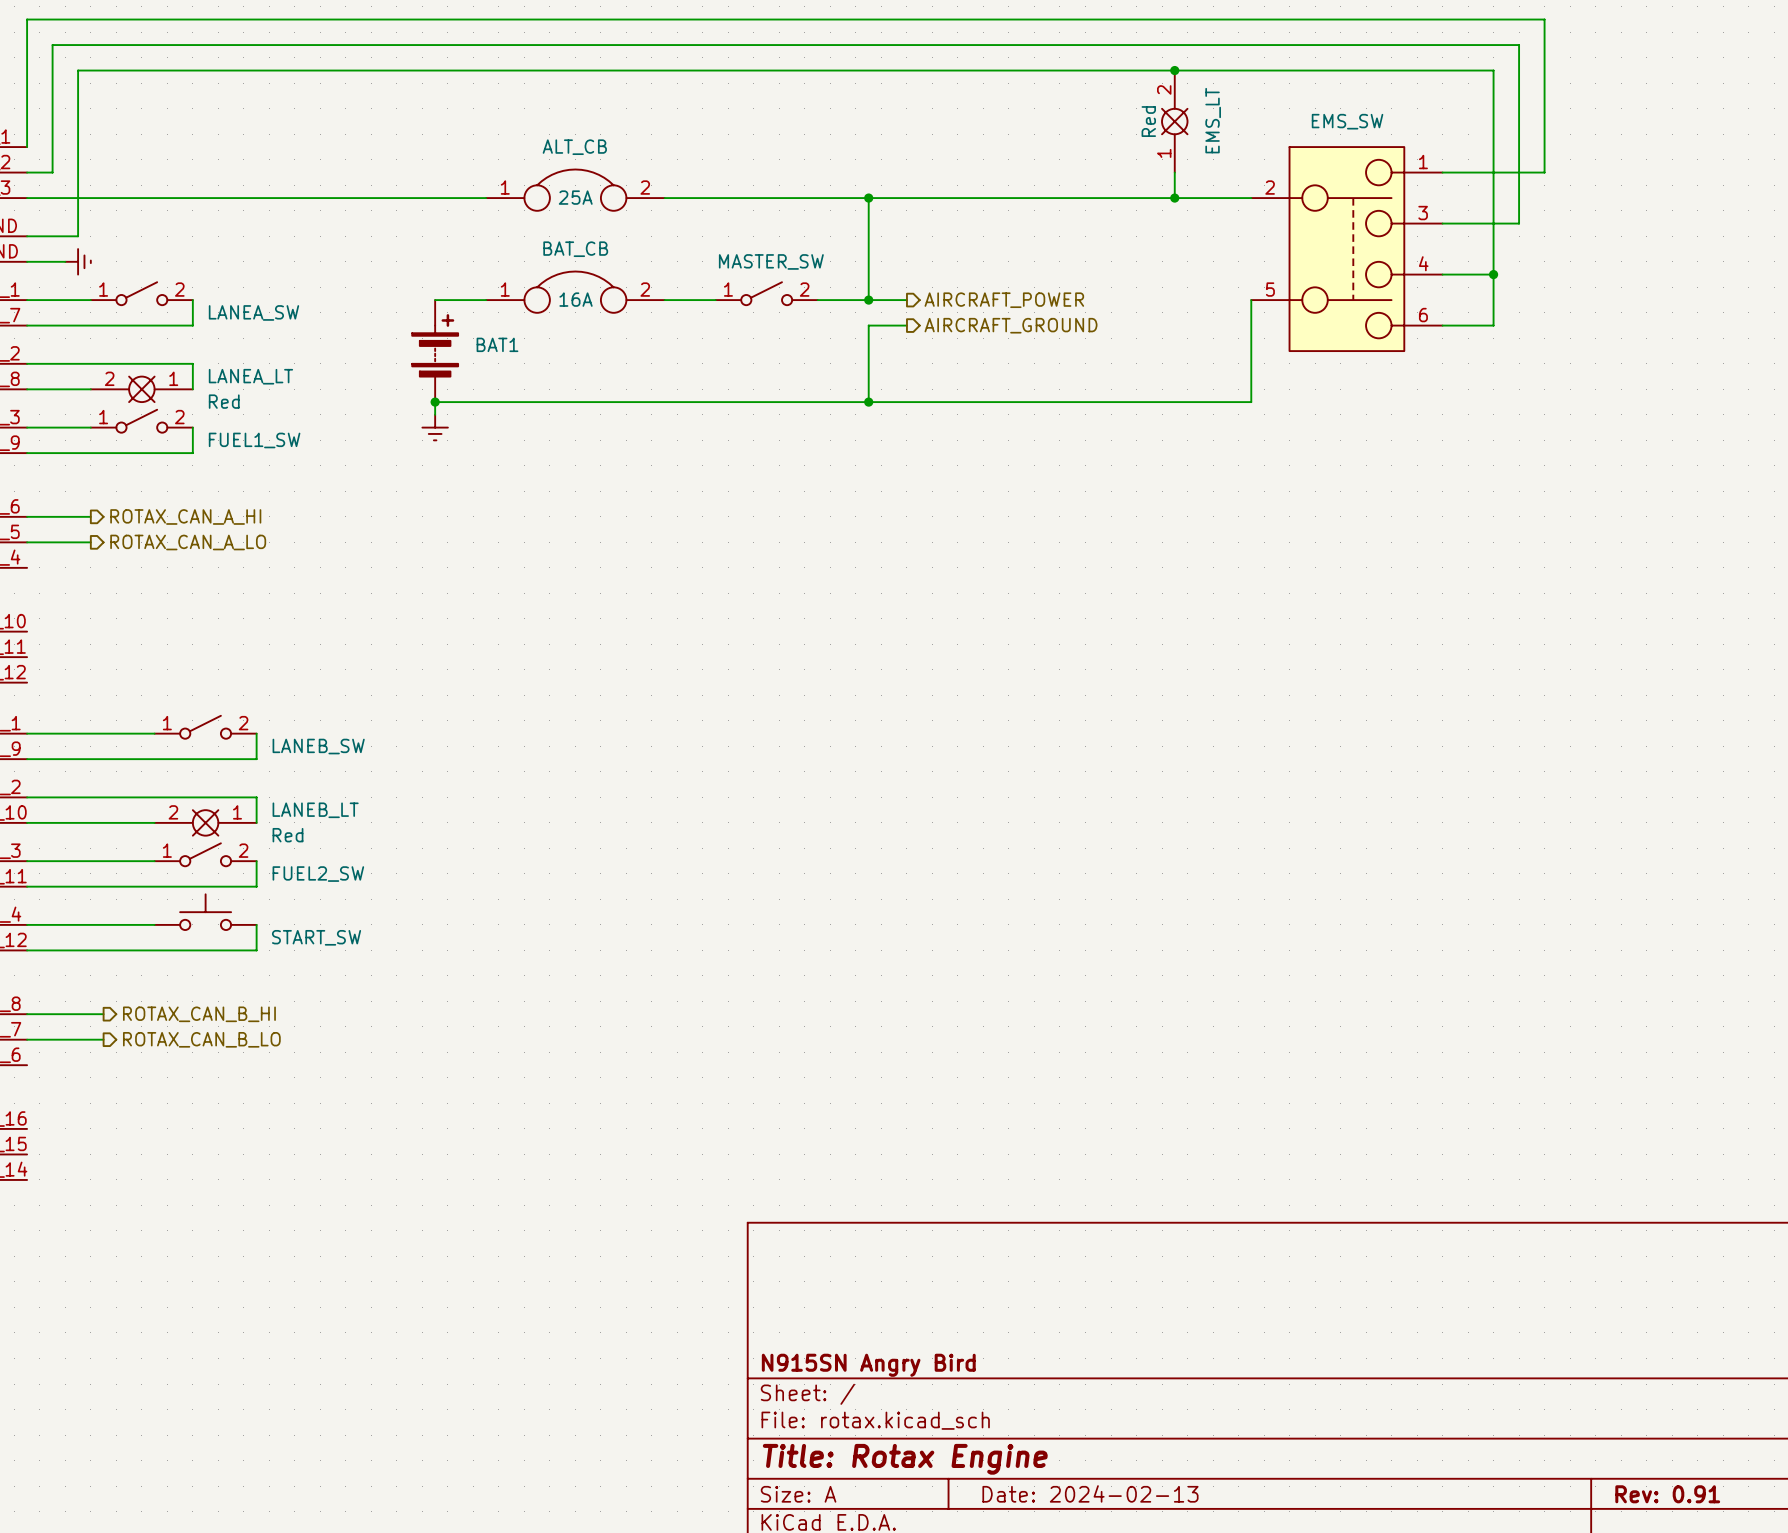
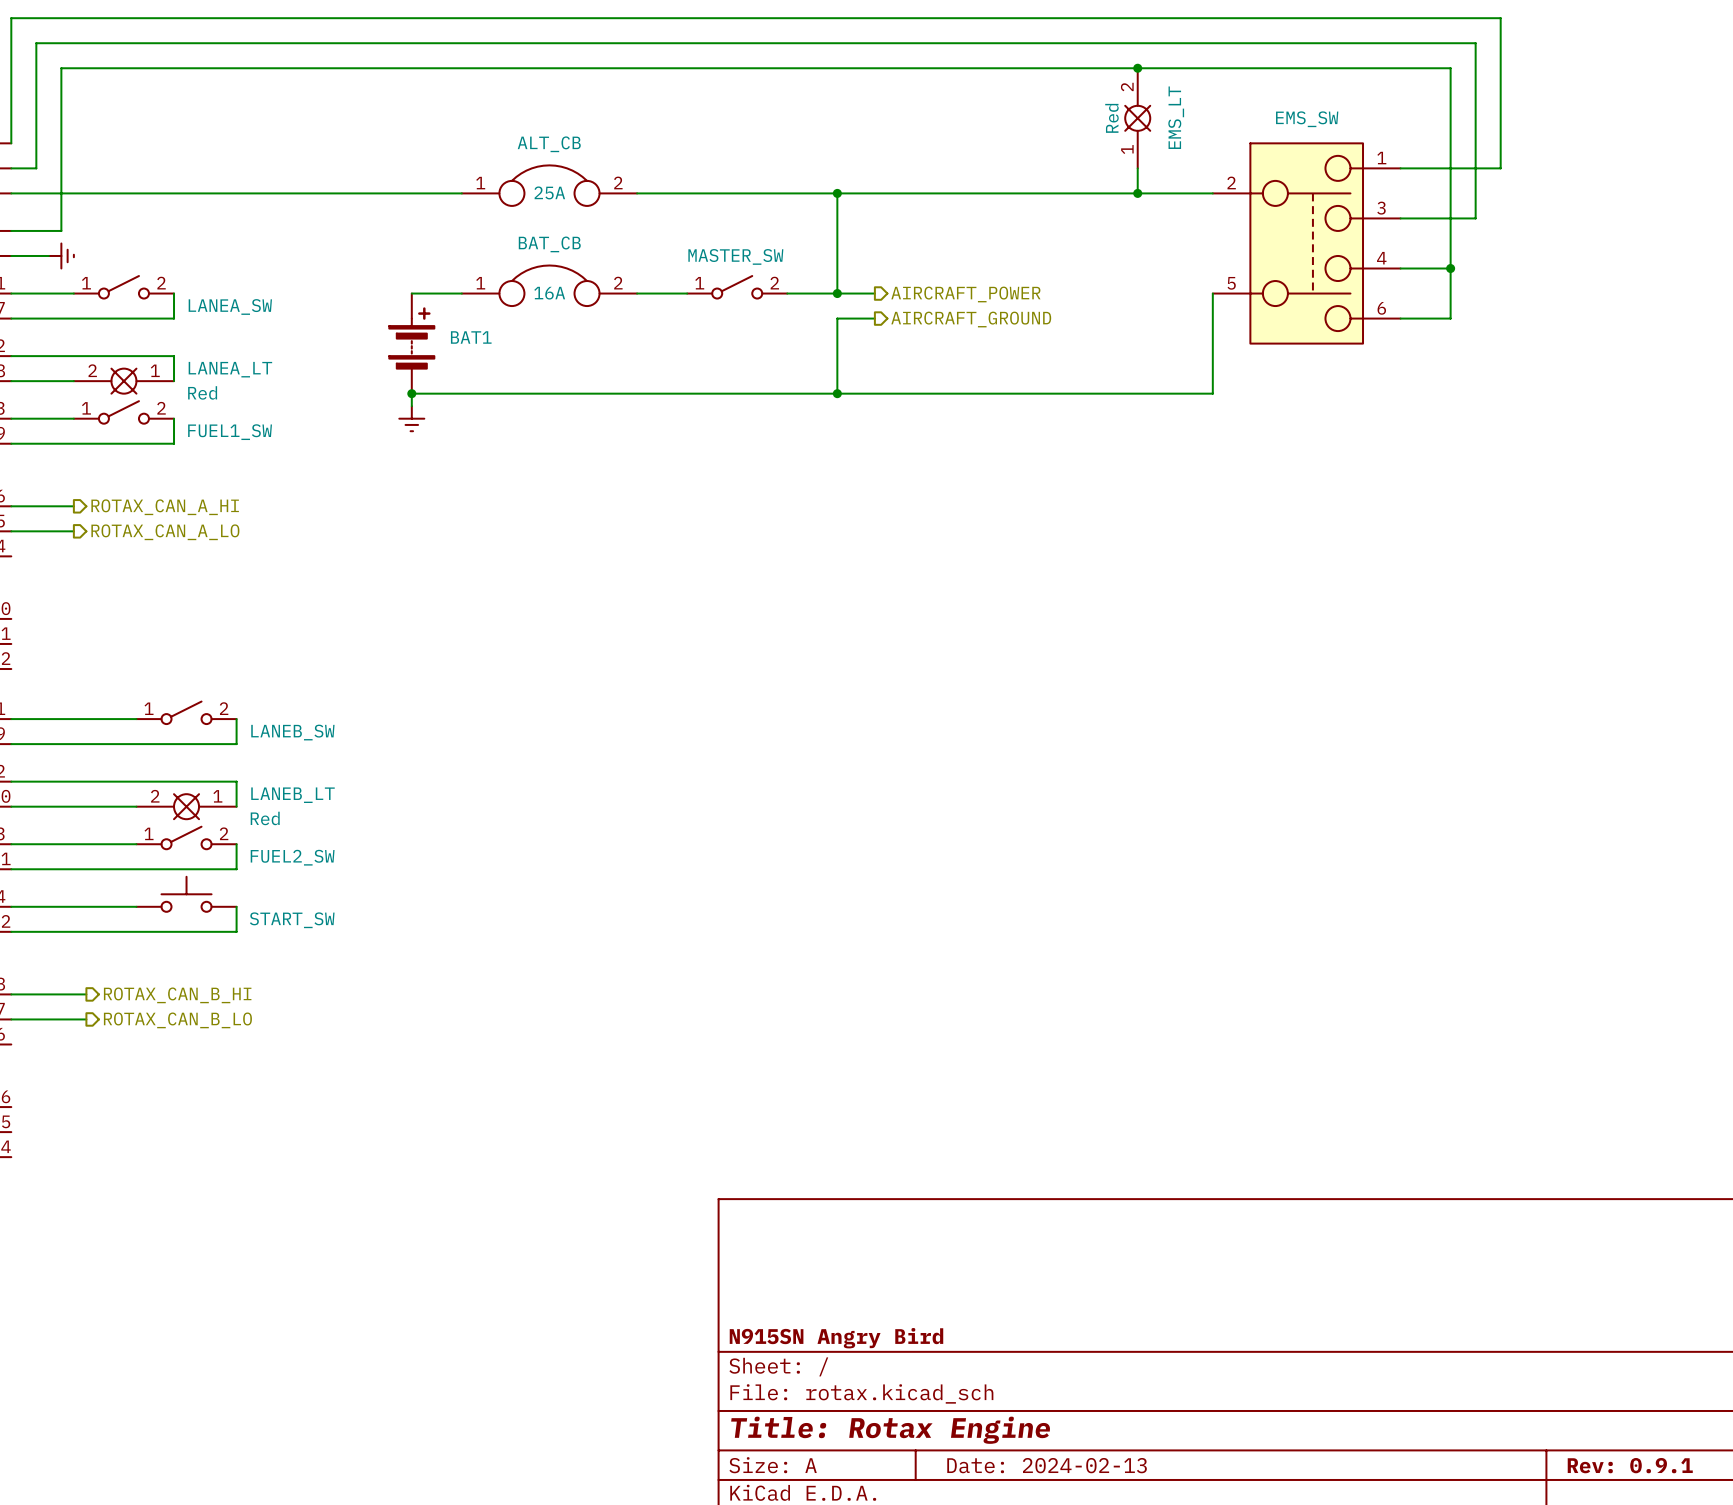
title block: Rev: 0.91 (1667, 1494) -> Rev: 0.9.1 (1630, 1465)

